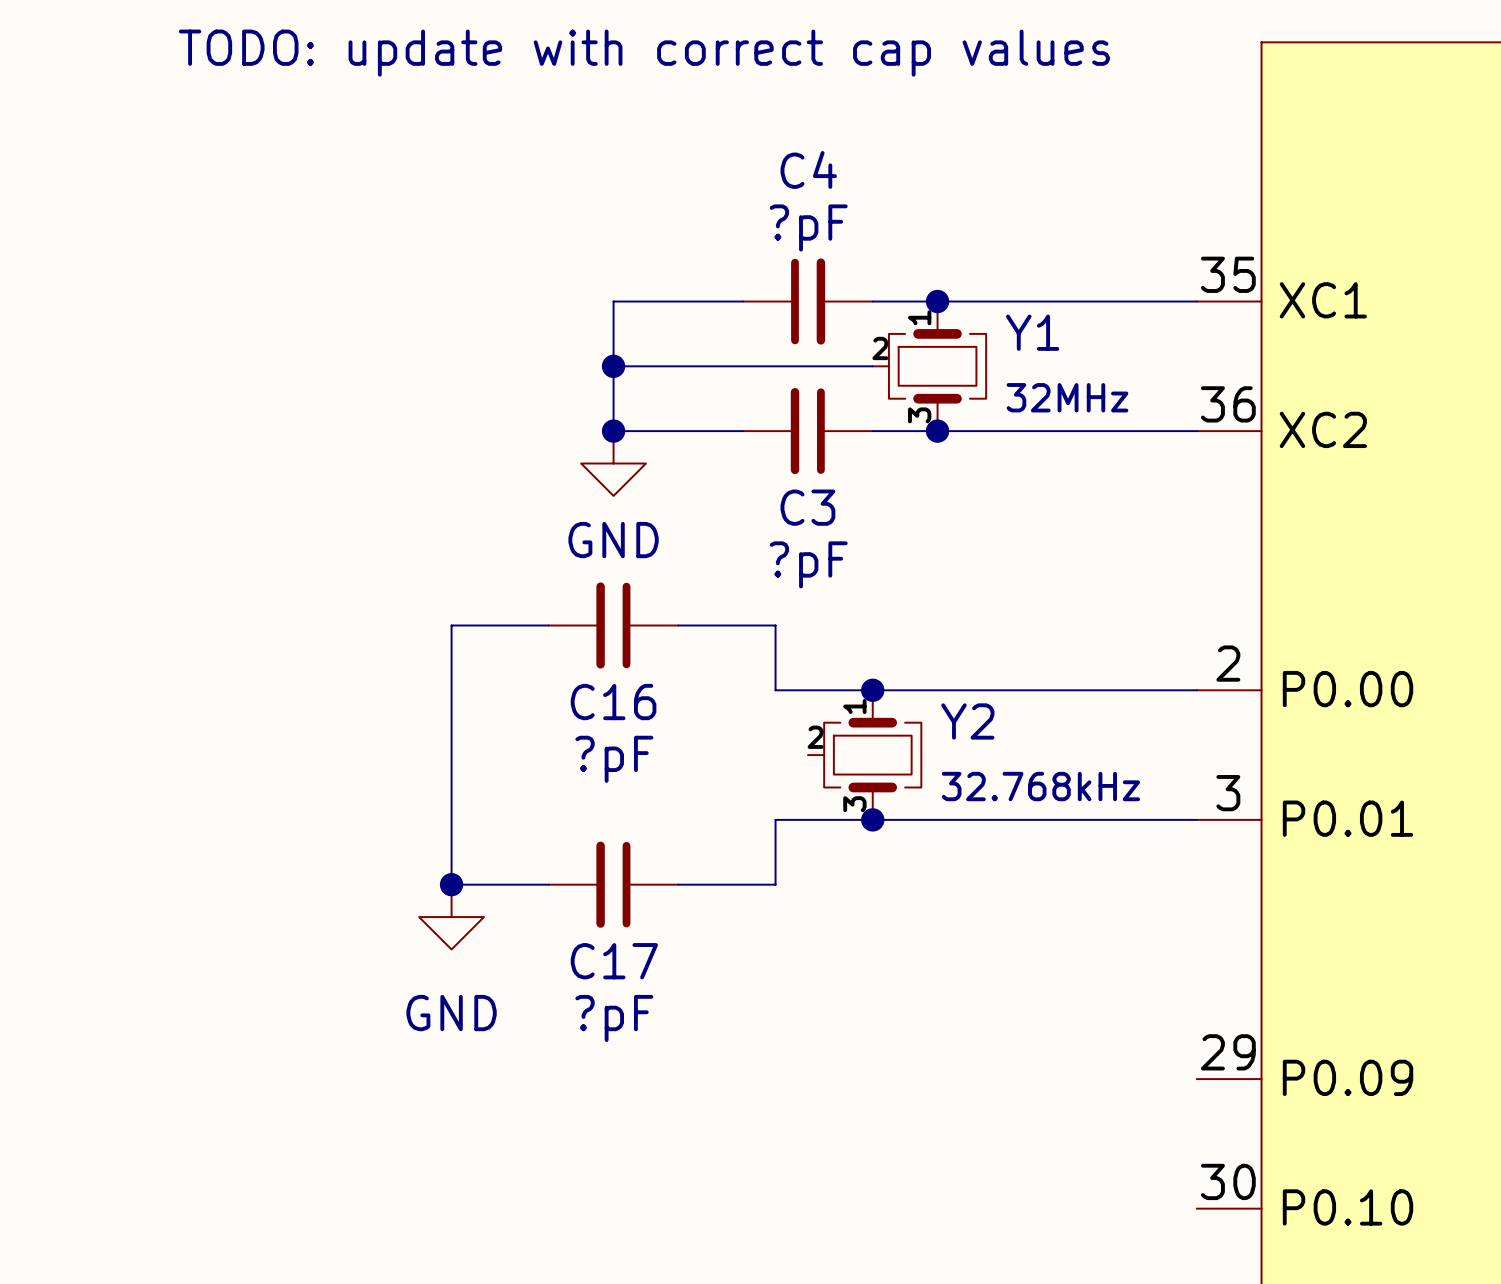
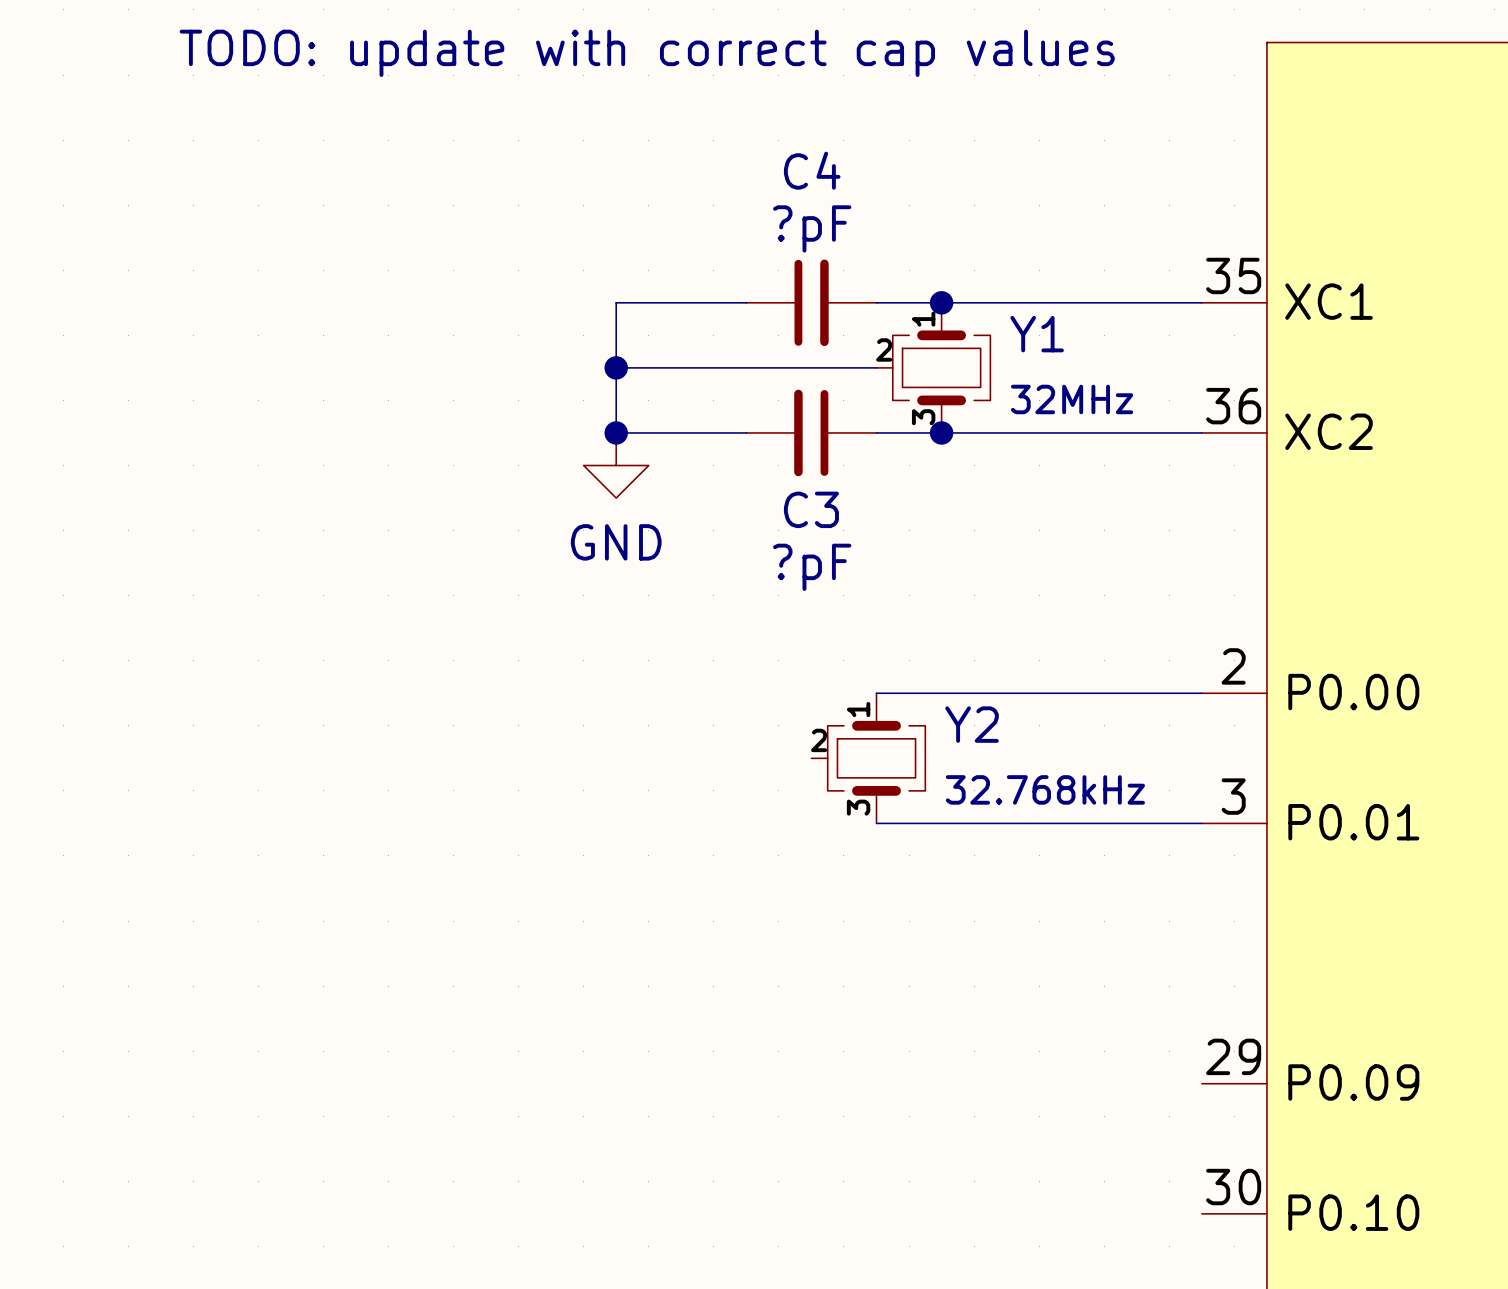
wire: (548, 625) (451, 625) (451, 884) (548, 884) -> none
C16: ?pF (613, 625) -> none
wire: (678, 625) (775, 625) (775, 690) (872, 690) -> none
junction: (872, 690) -> none
wire: (872, 819) (775, 819) (775, 884) (678, 884) -> none
junction: (872, 819) -> none
junction: (451, 884) -> none
C17: ?pF (613, 884) -> none
power symbol: GND (451, 917) -> none

